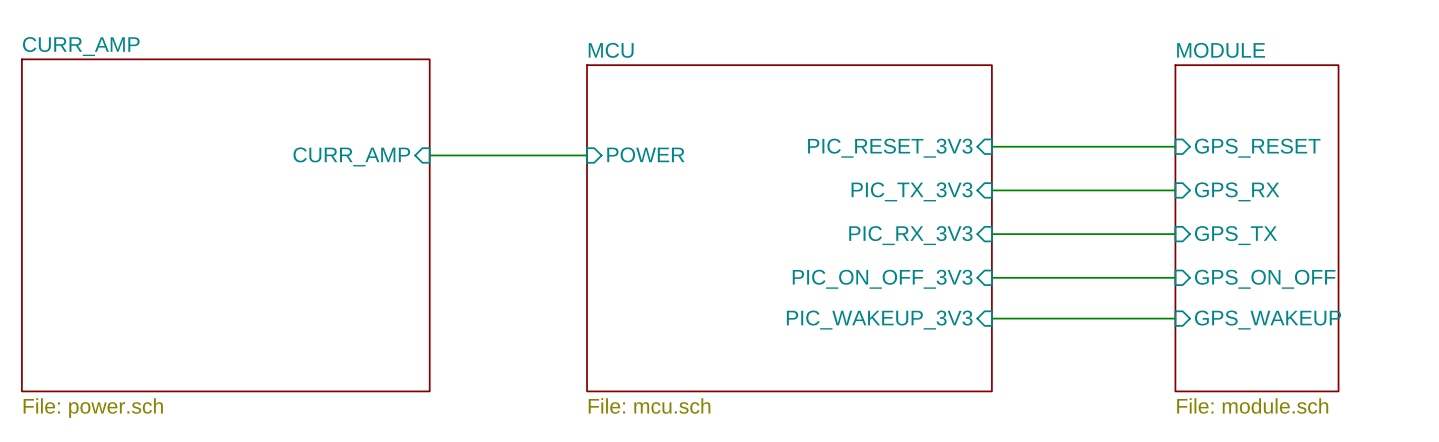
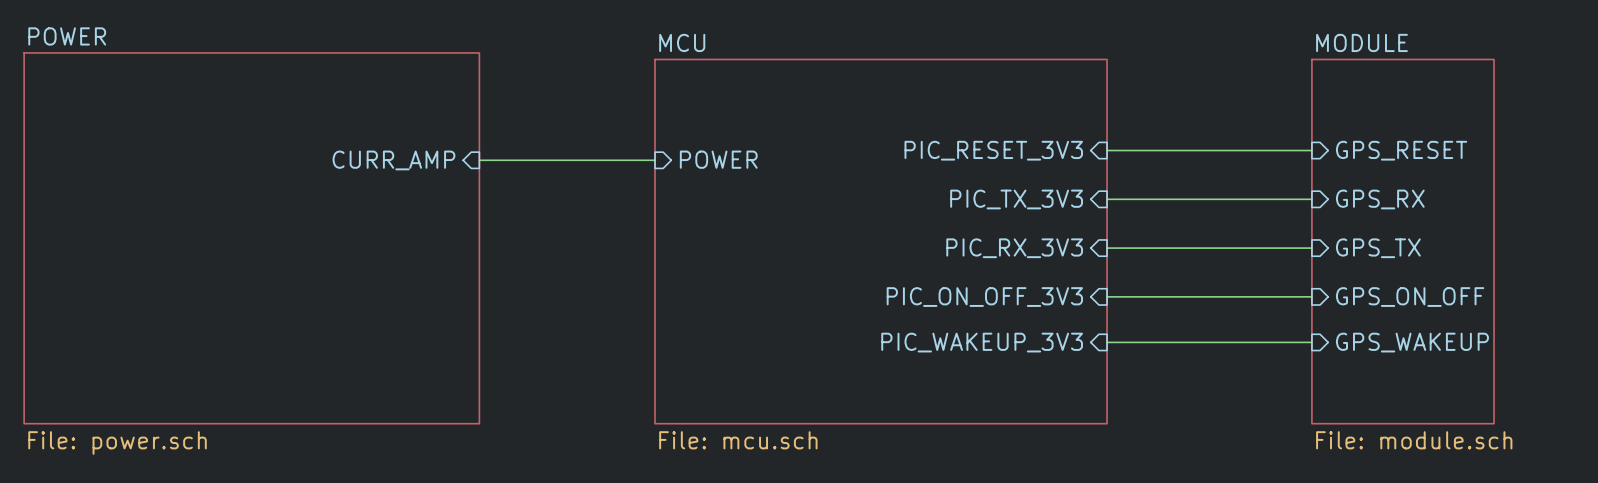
sheet CURR_AMP name: CURR_AMP (81, 46) -> POWER (67, 36)

